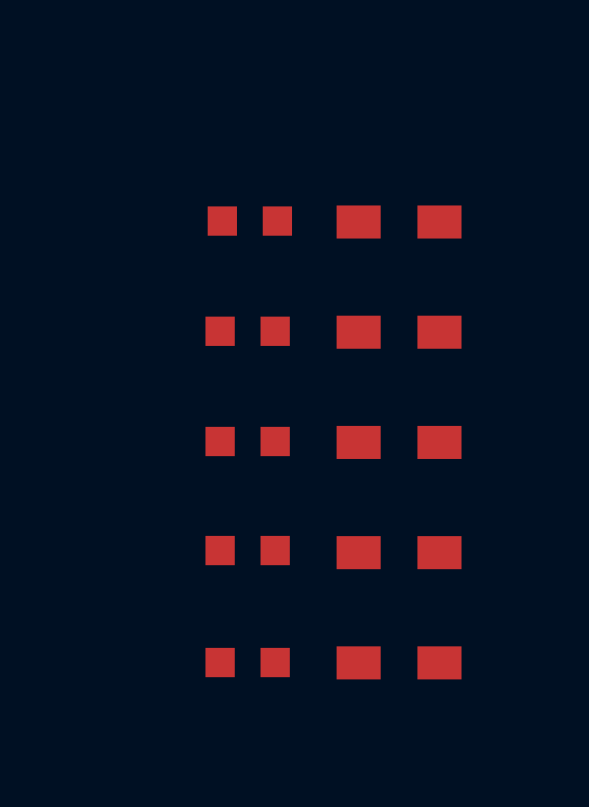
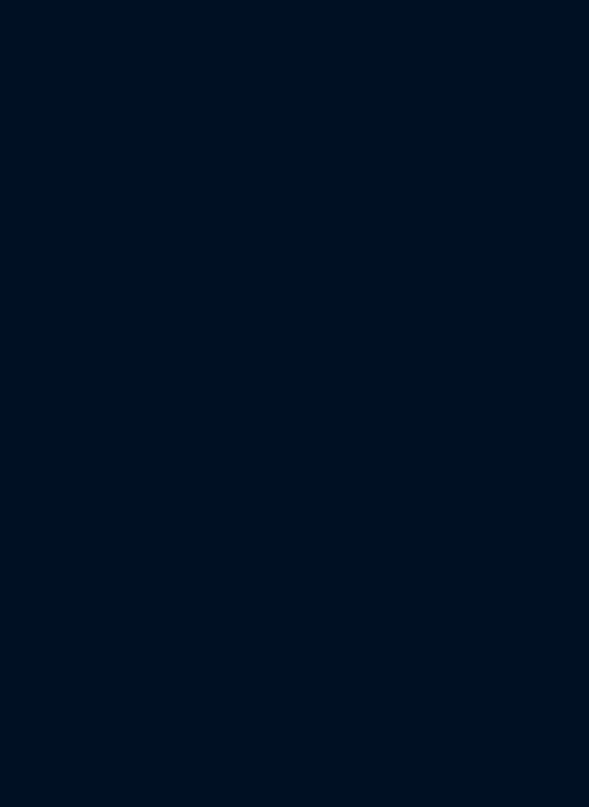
part: (249, 221) -> none
part: (399, 221) -> none
part: (247, 331) -> none
part: (399, 332) -> none
part: (247, 441) -> none
part: (399, 442) -> none
part: (247, 550) -> none
part: (399, 552) -> none
part: (247, 662) -> none
part: (399, 662) -> none

